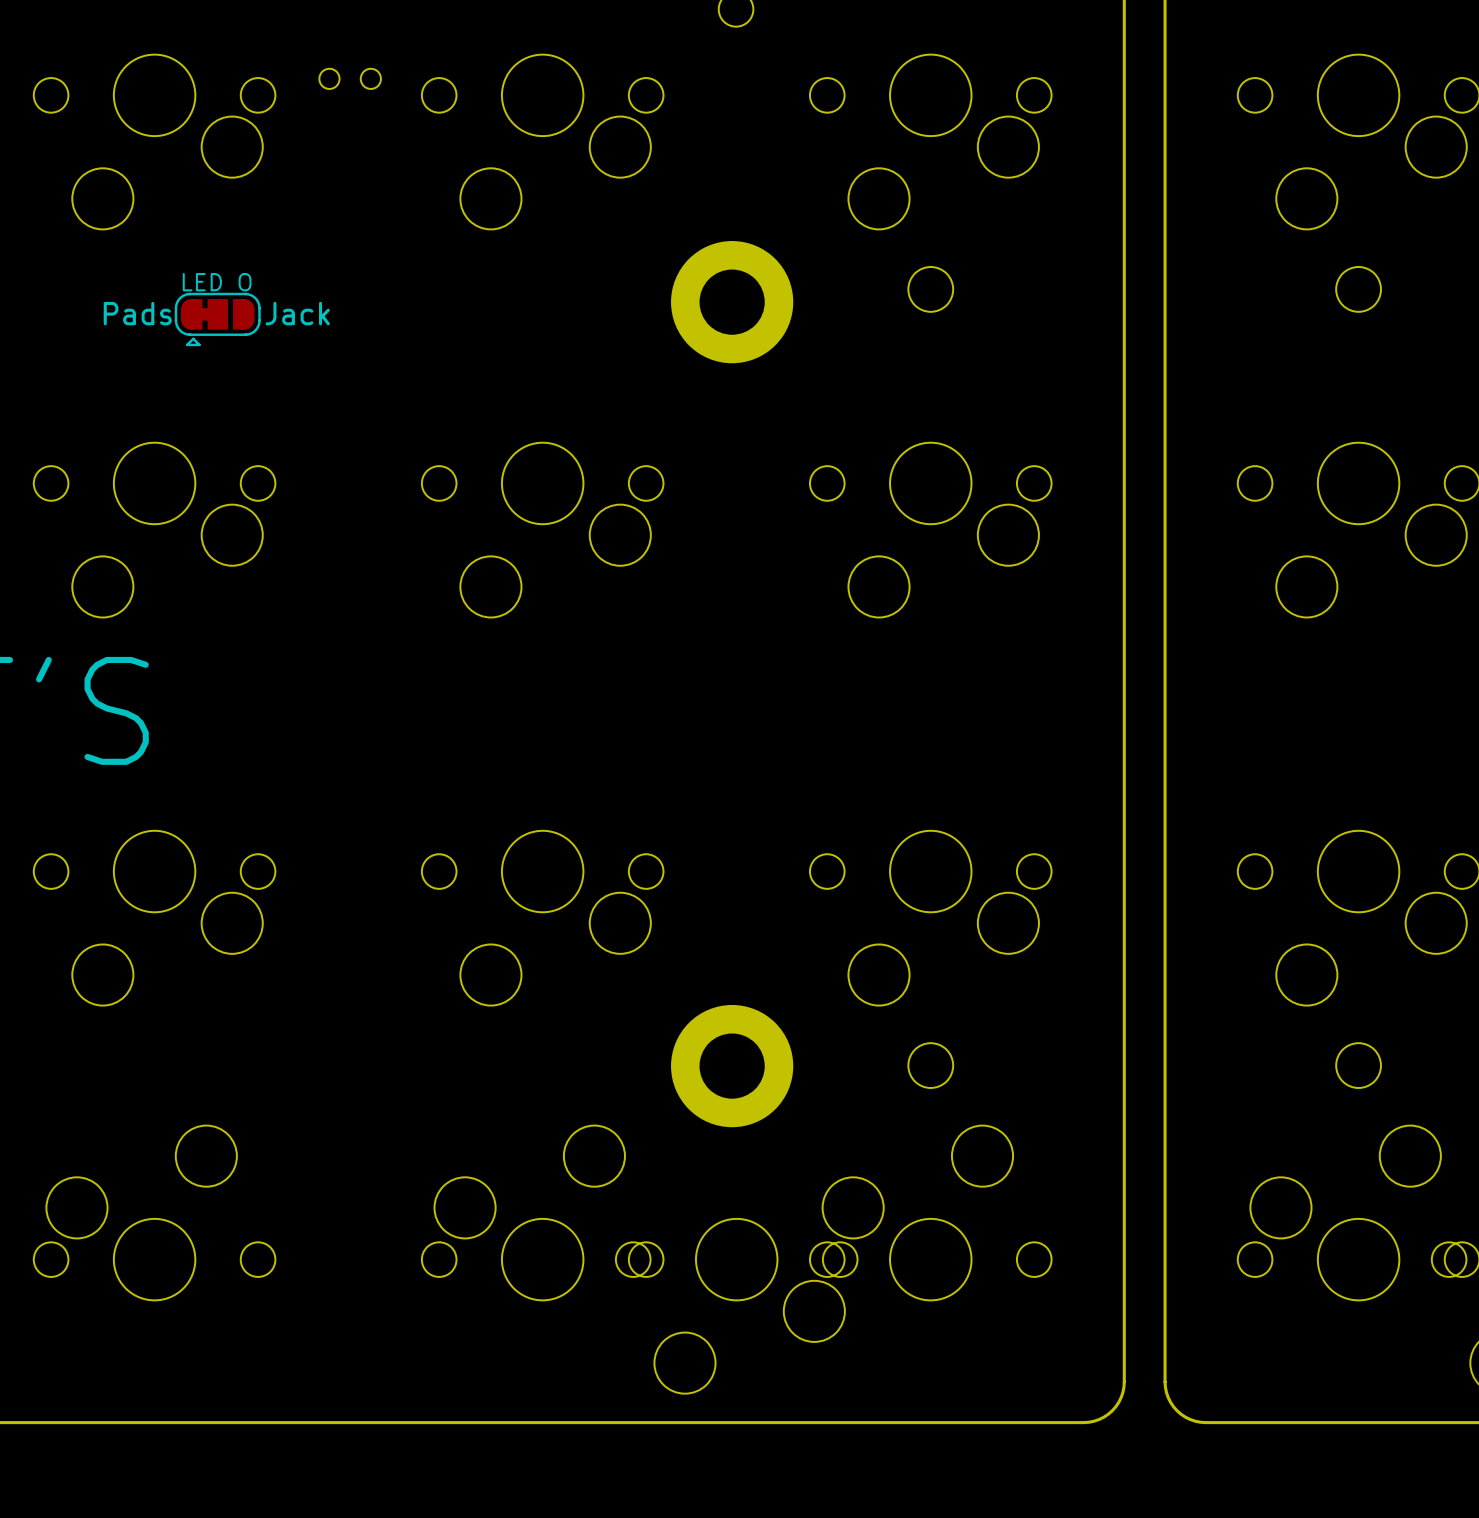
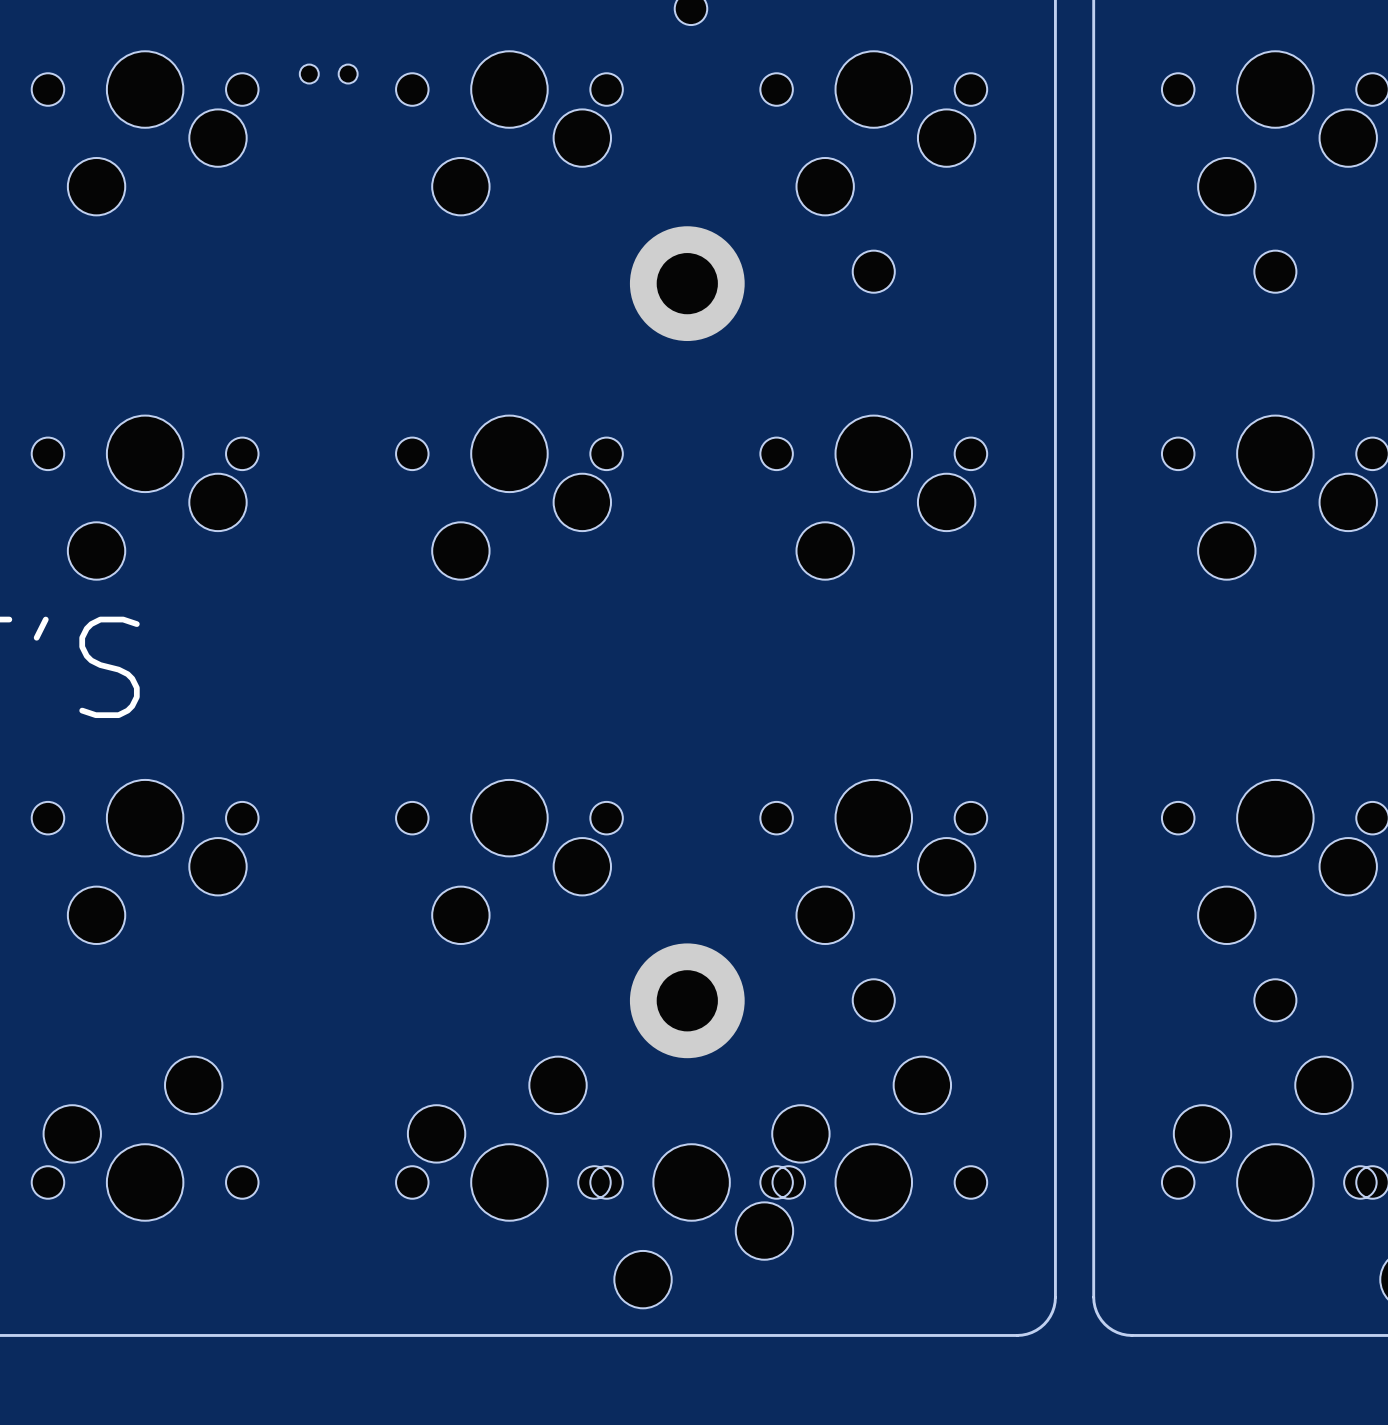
text: LED O (217, 282) -> none
text: Pads (137, 313) -> none
text: Jack (297, 313) -> none
part: (217, 319) -> none

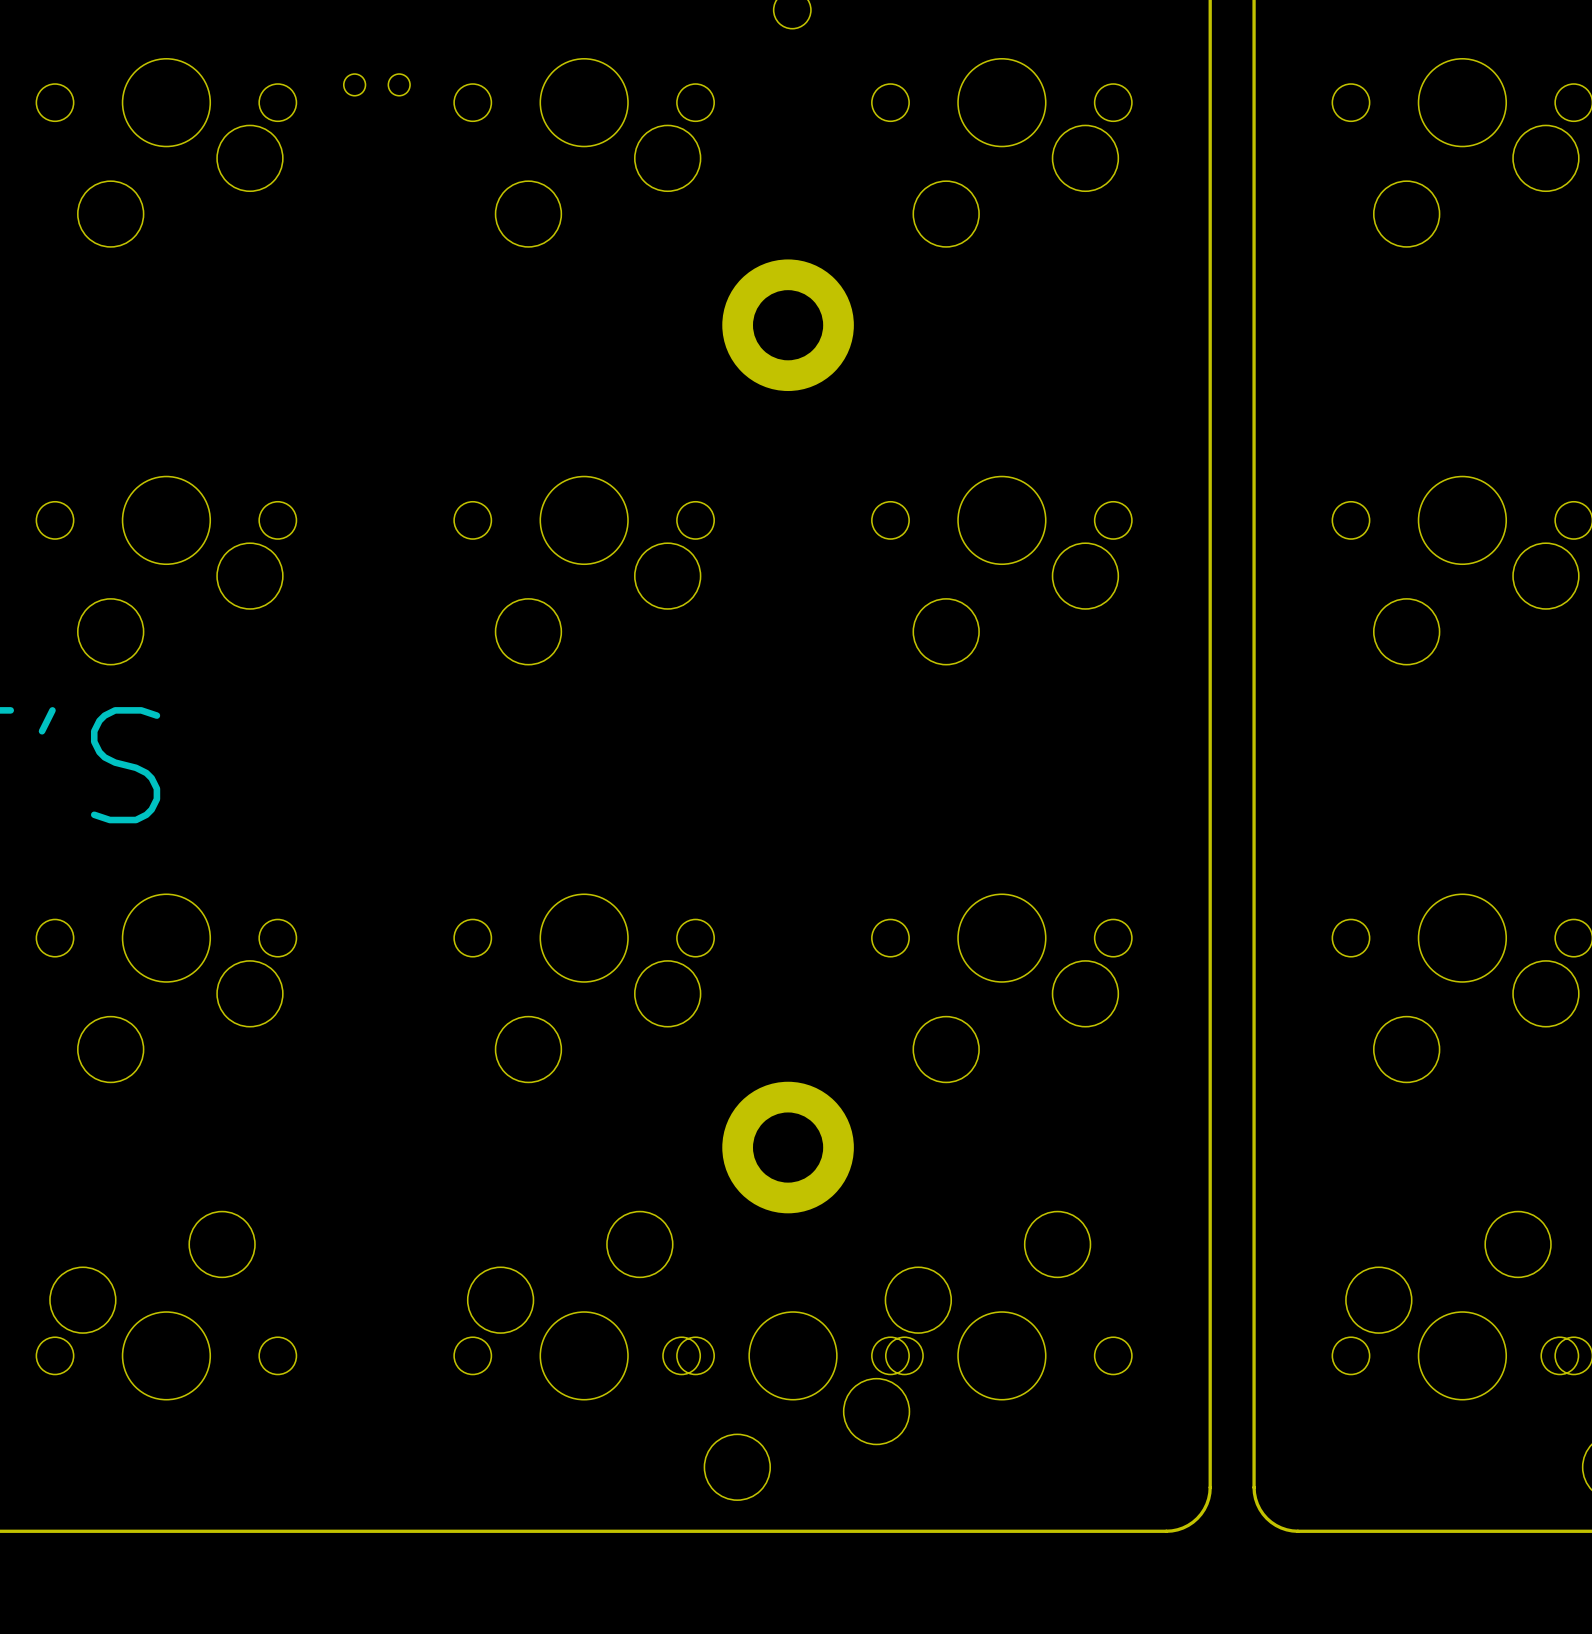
part: (873, 271) -> none
part: (1275, 271) -> none
part: (873, 1000) -> none
part: (1275, 1000) -> none

